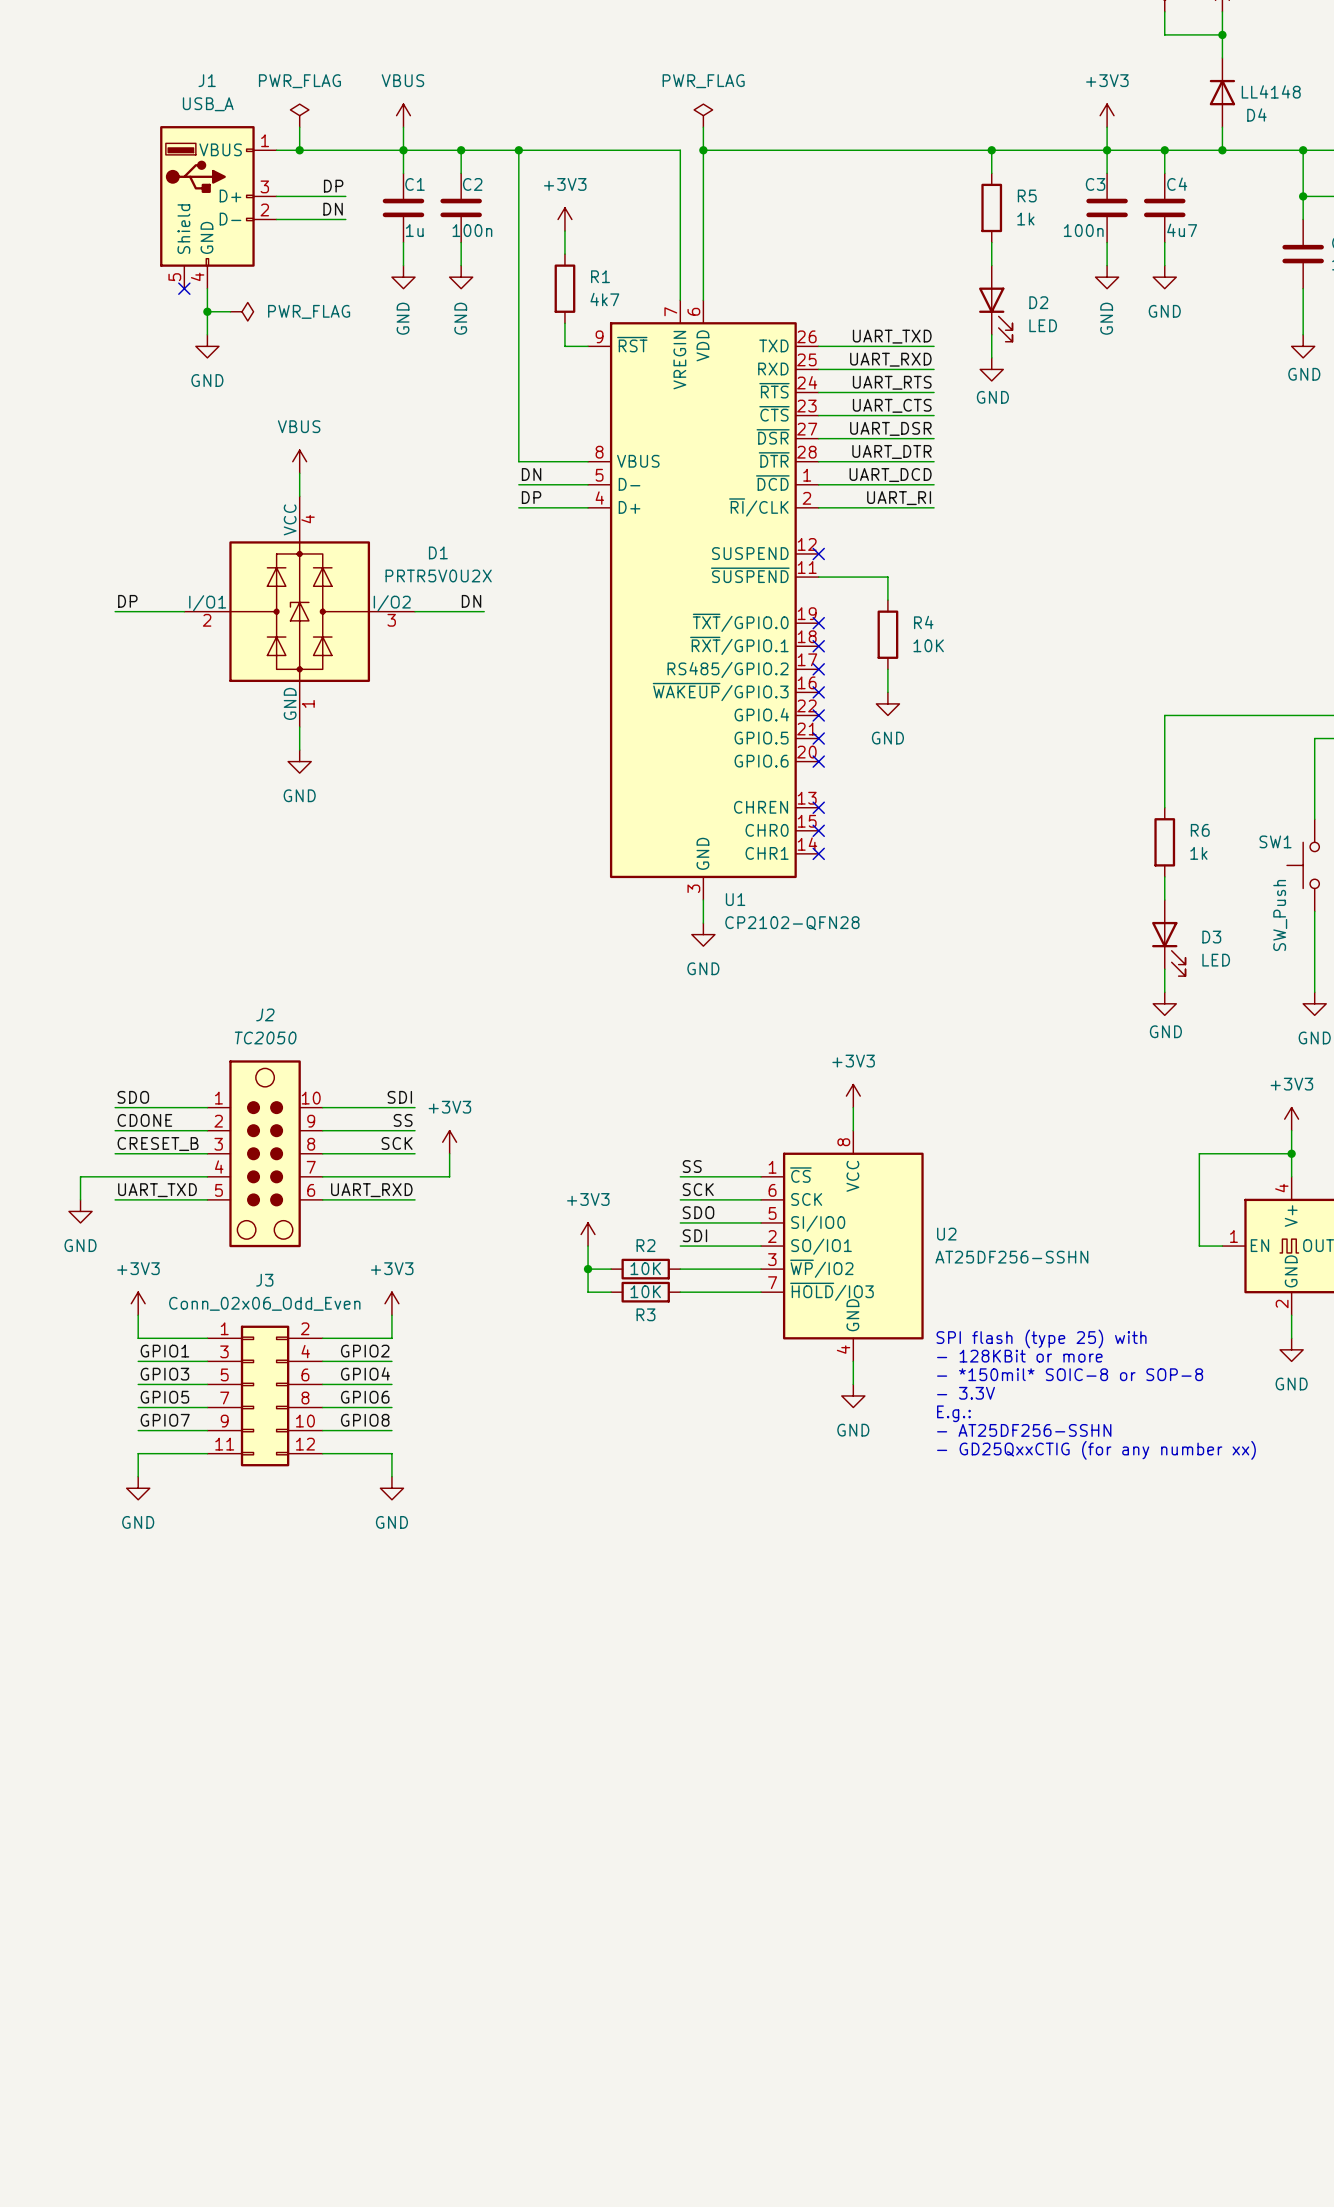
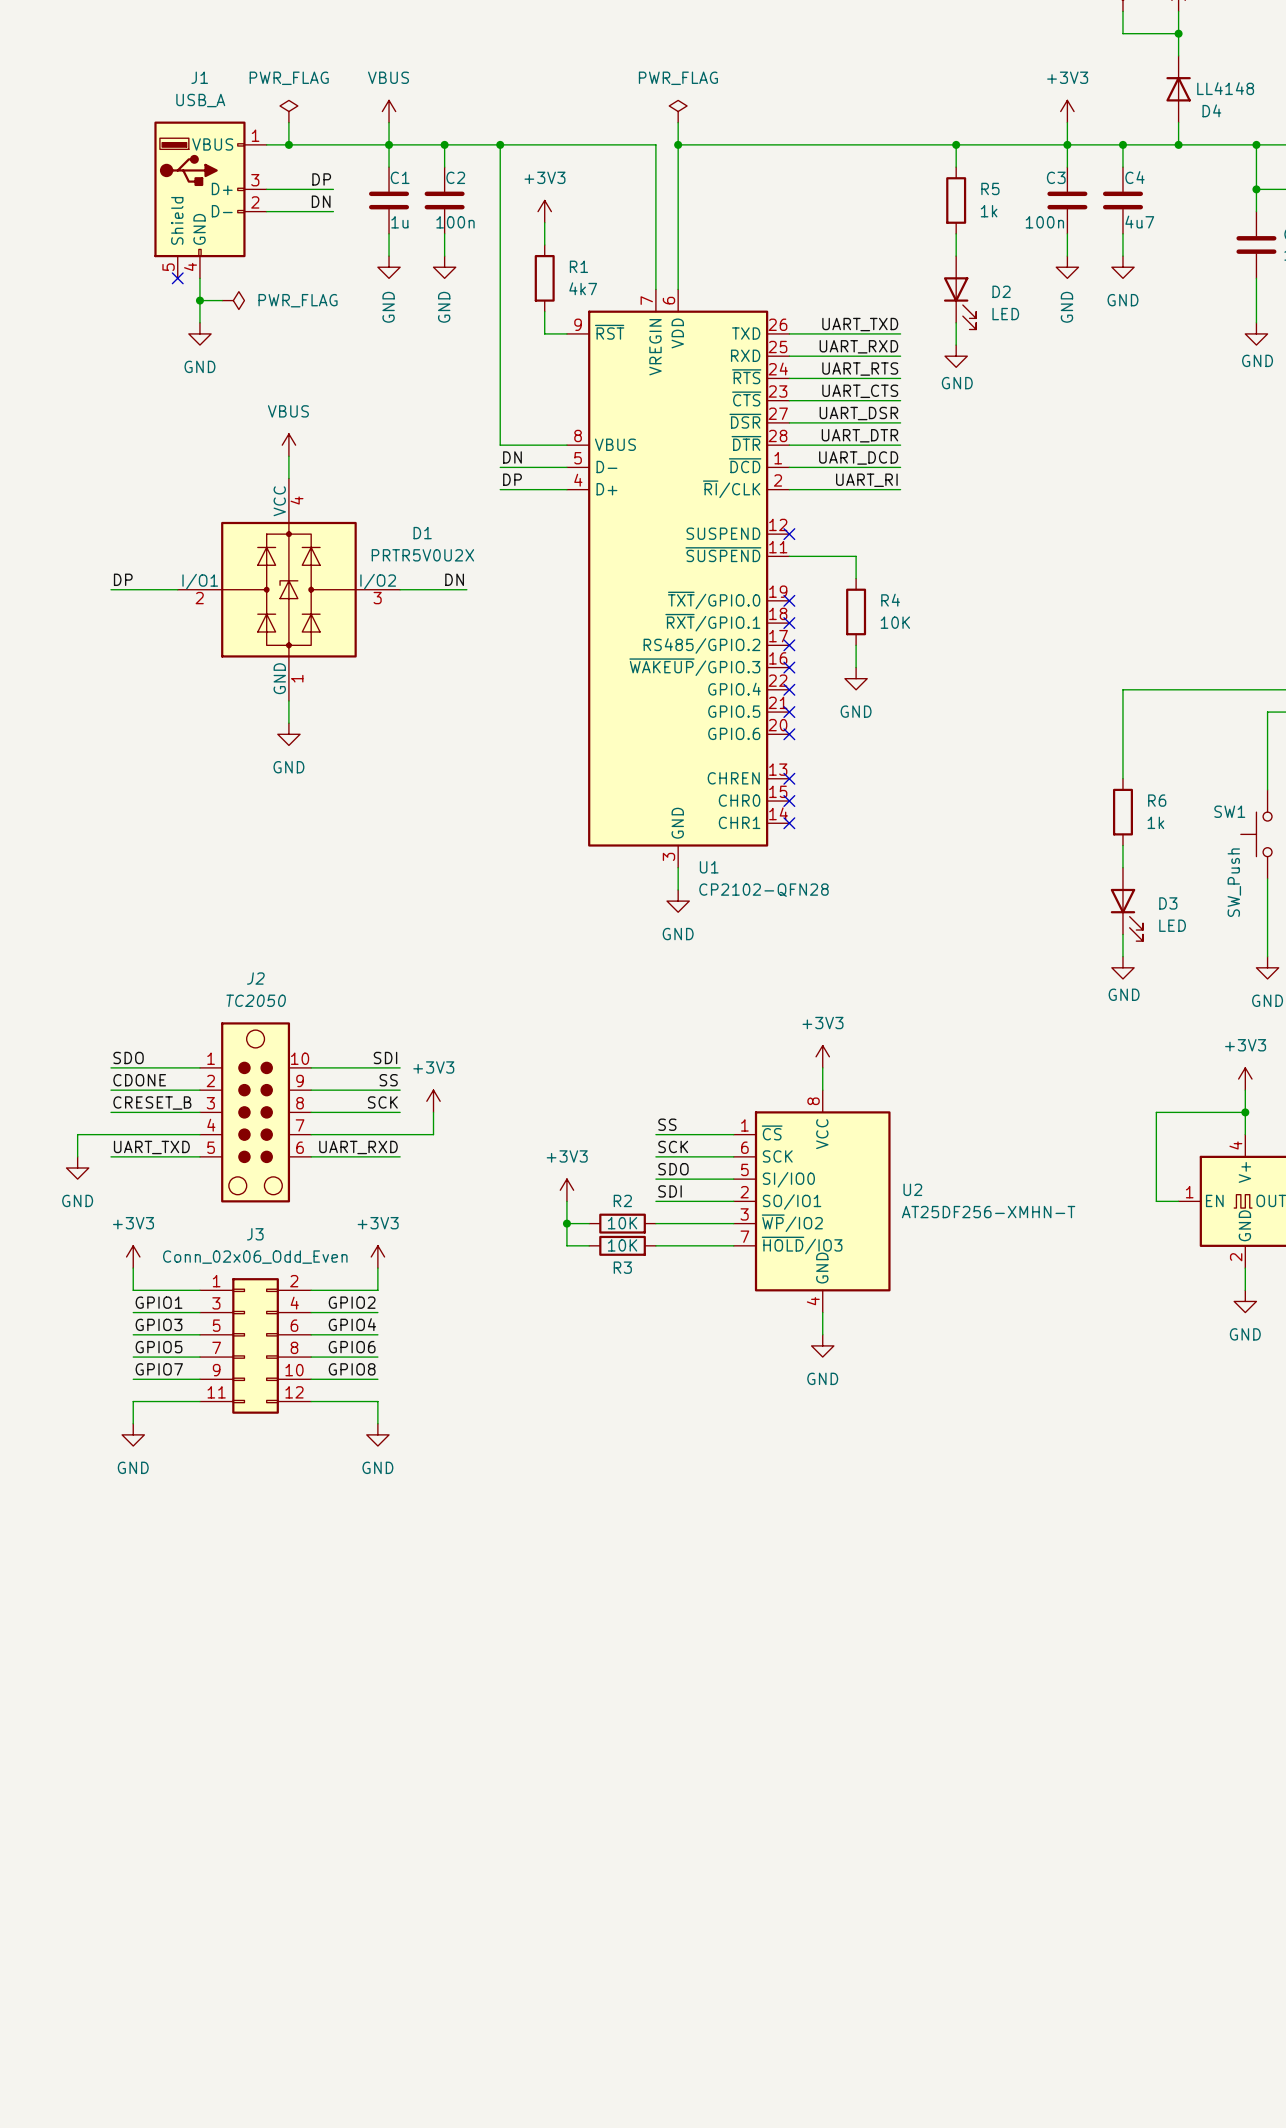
U2 value: AT25DF256-SSHN (1011, 1257) -> AT25DF256-XMHN-T (988, 1212)
text: SPI flash (type 25) with (1041, 1338) -> none
text: - 128KBit or more (1019, 1356) -> none
text: - *150mil* SOIC-8 or SOP-8 (1070, 1374) -> none
text: - 3.3V (966, 1393) -> none
text: E.g.: (953, 1413) -> none
text: - AT25DF256-SSHN (1024, 1430) -> none
text: - GD25QxxCTIG (for any number xx) (1096, 1450) -> none

